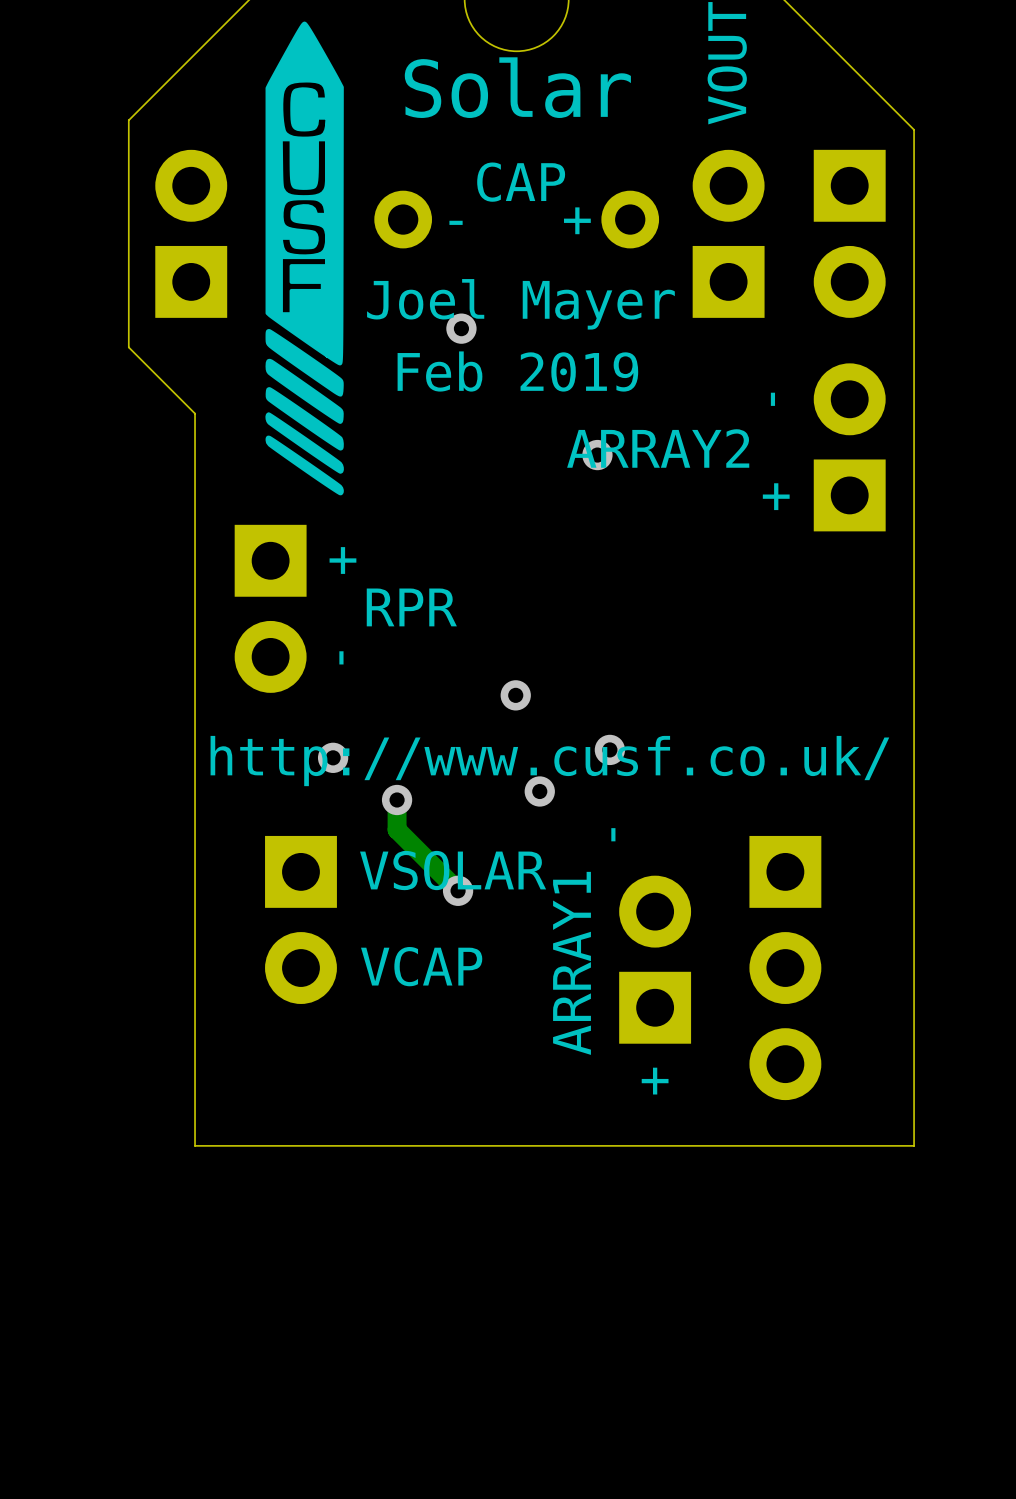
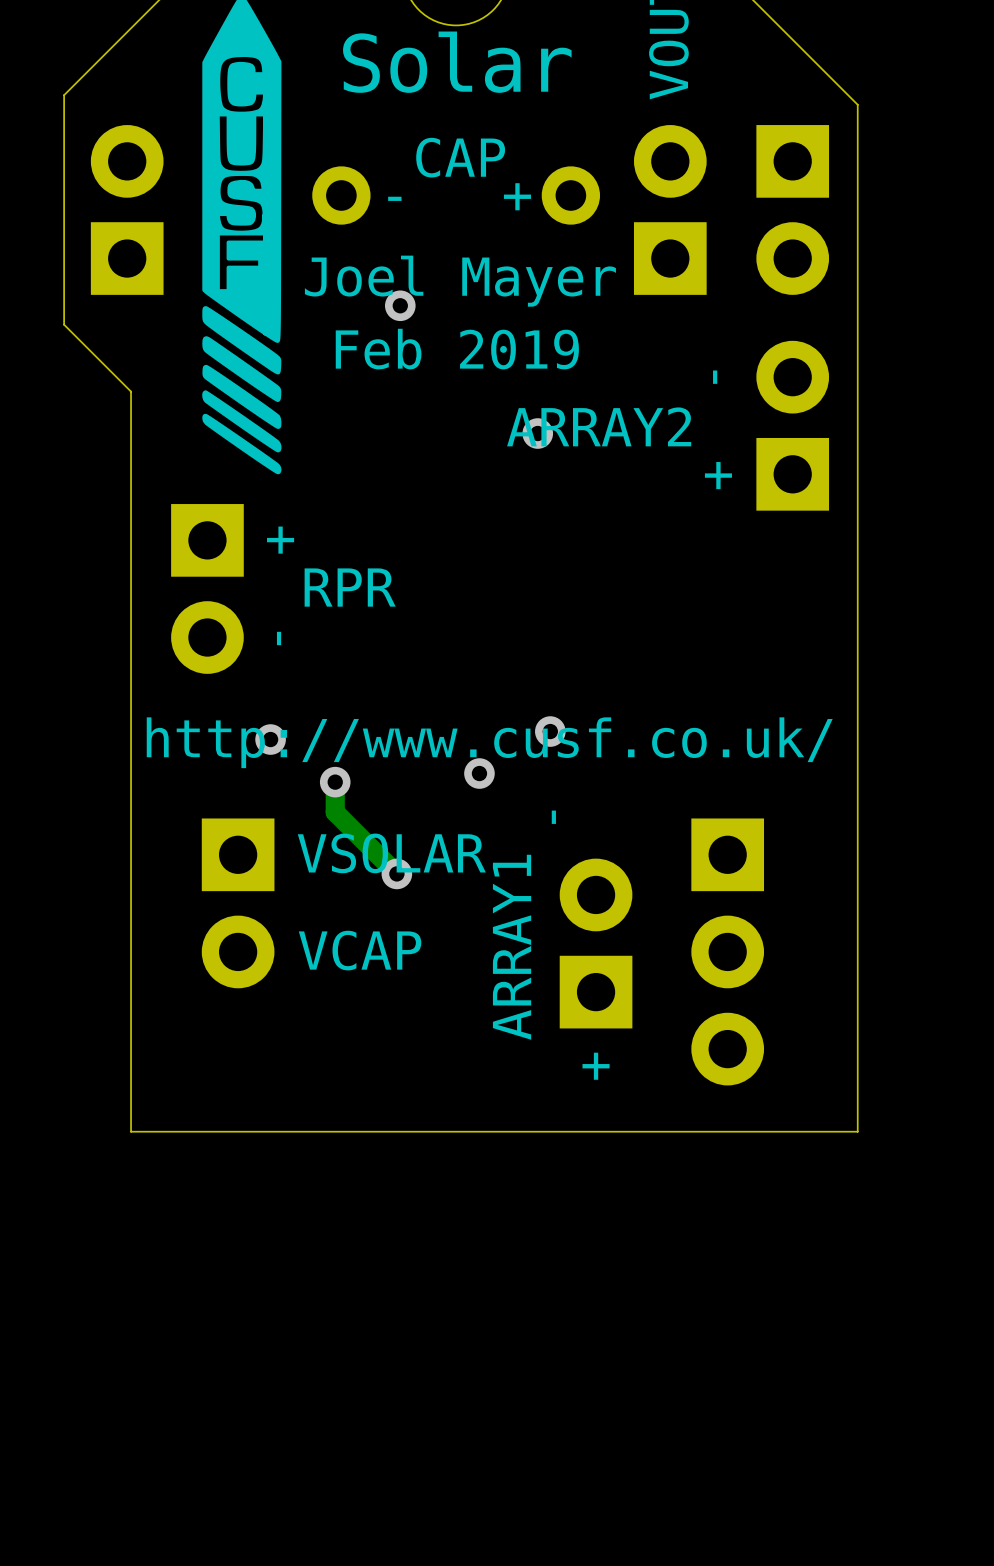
via: (515, 695) -> none

